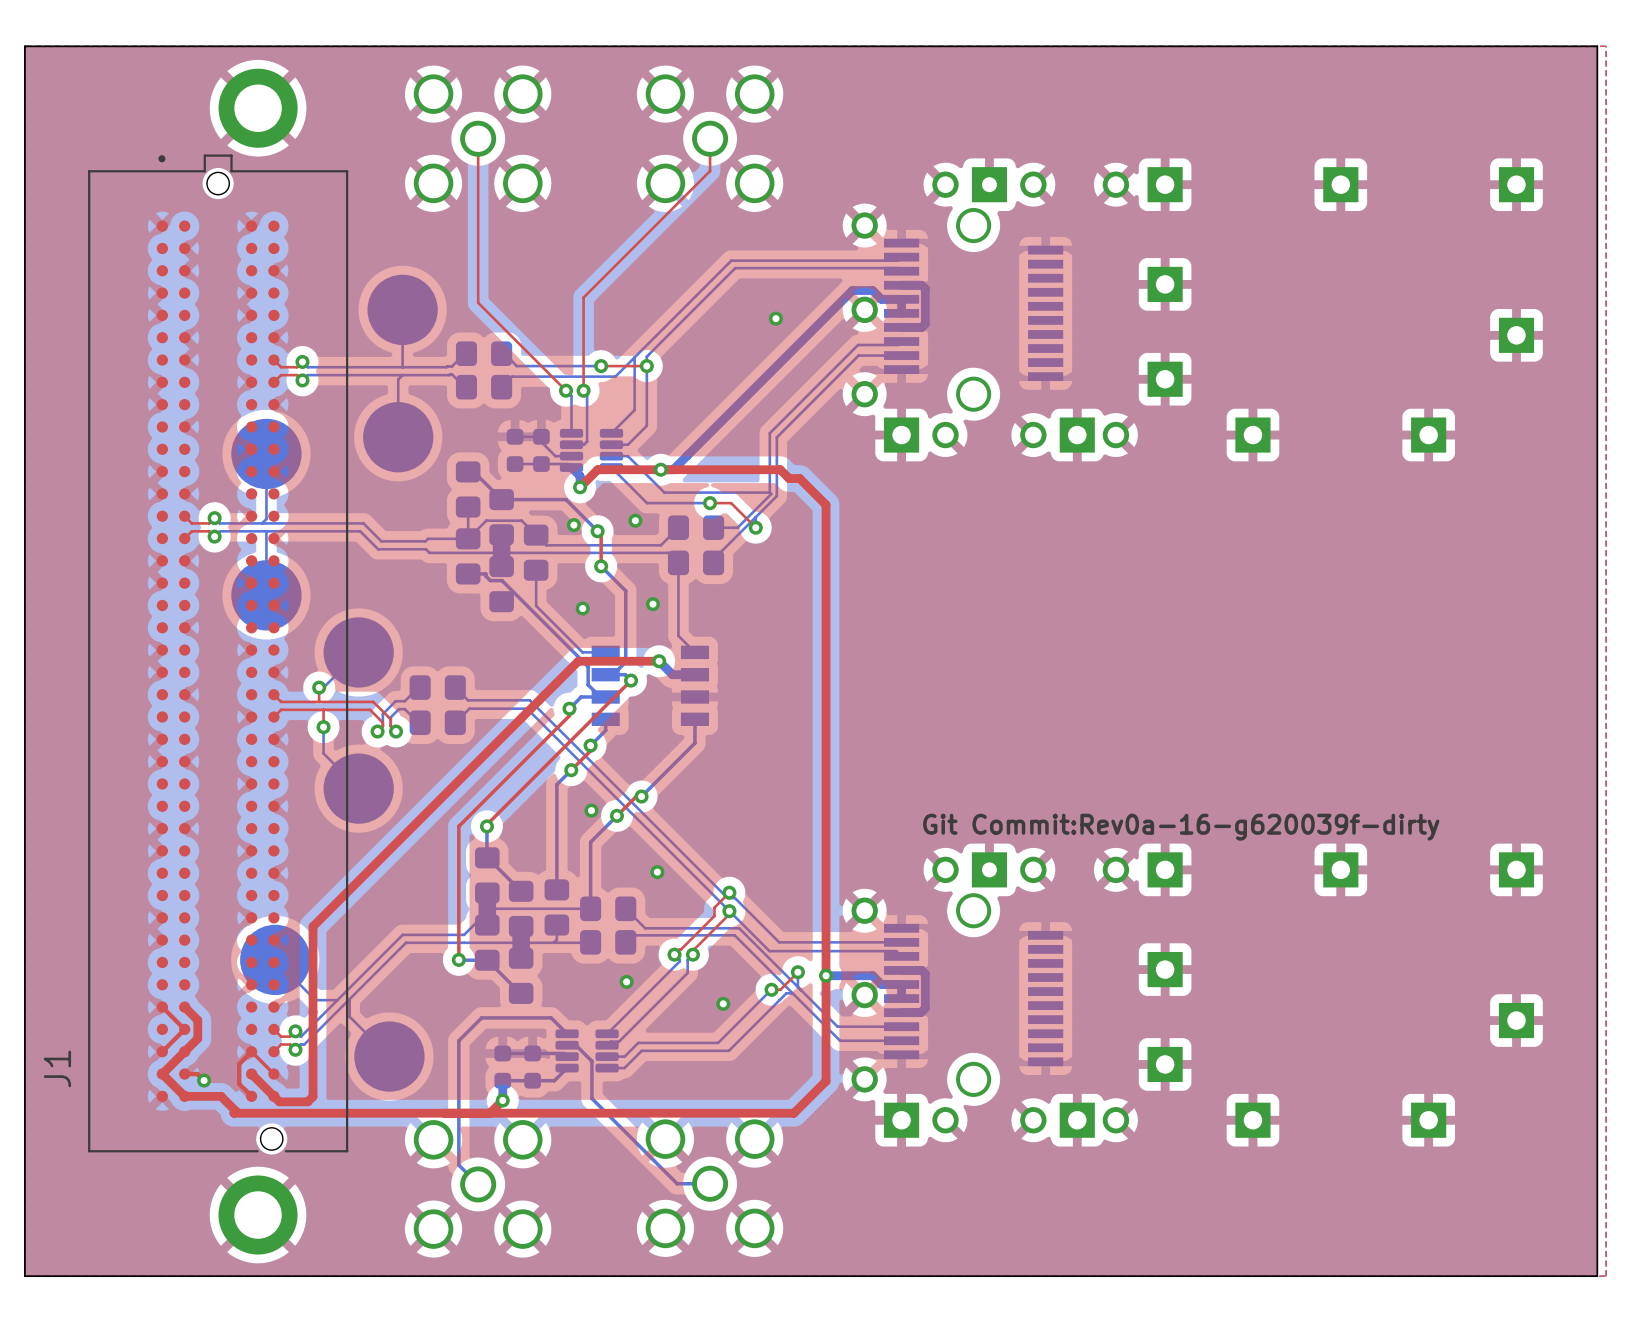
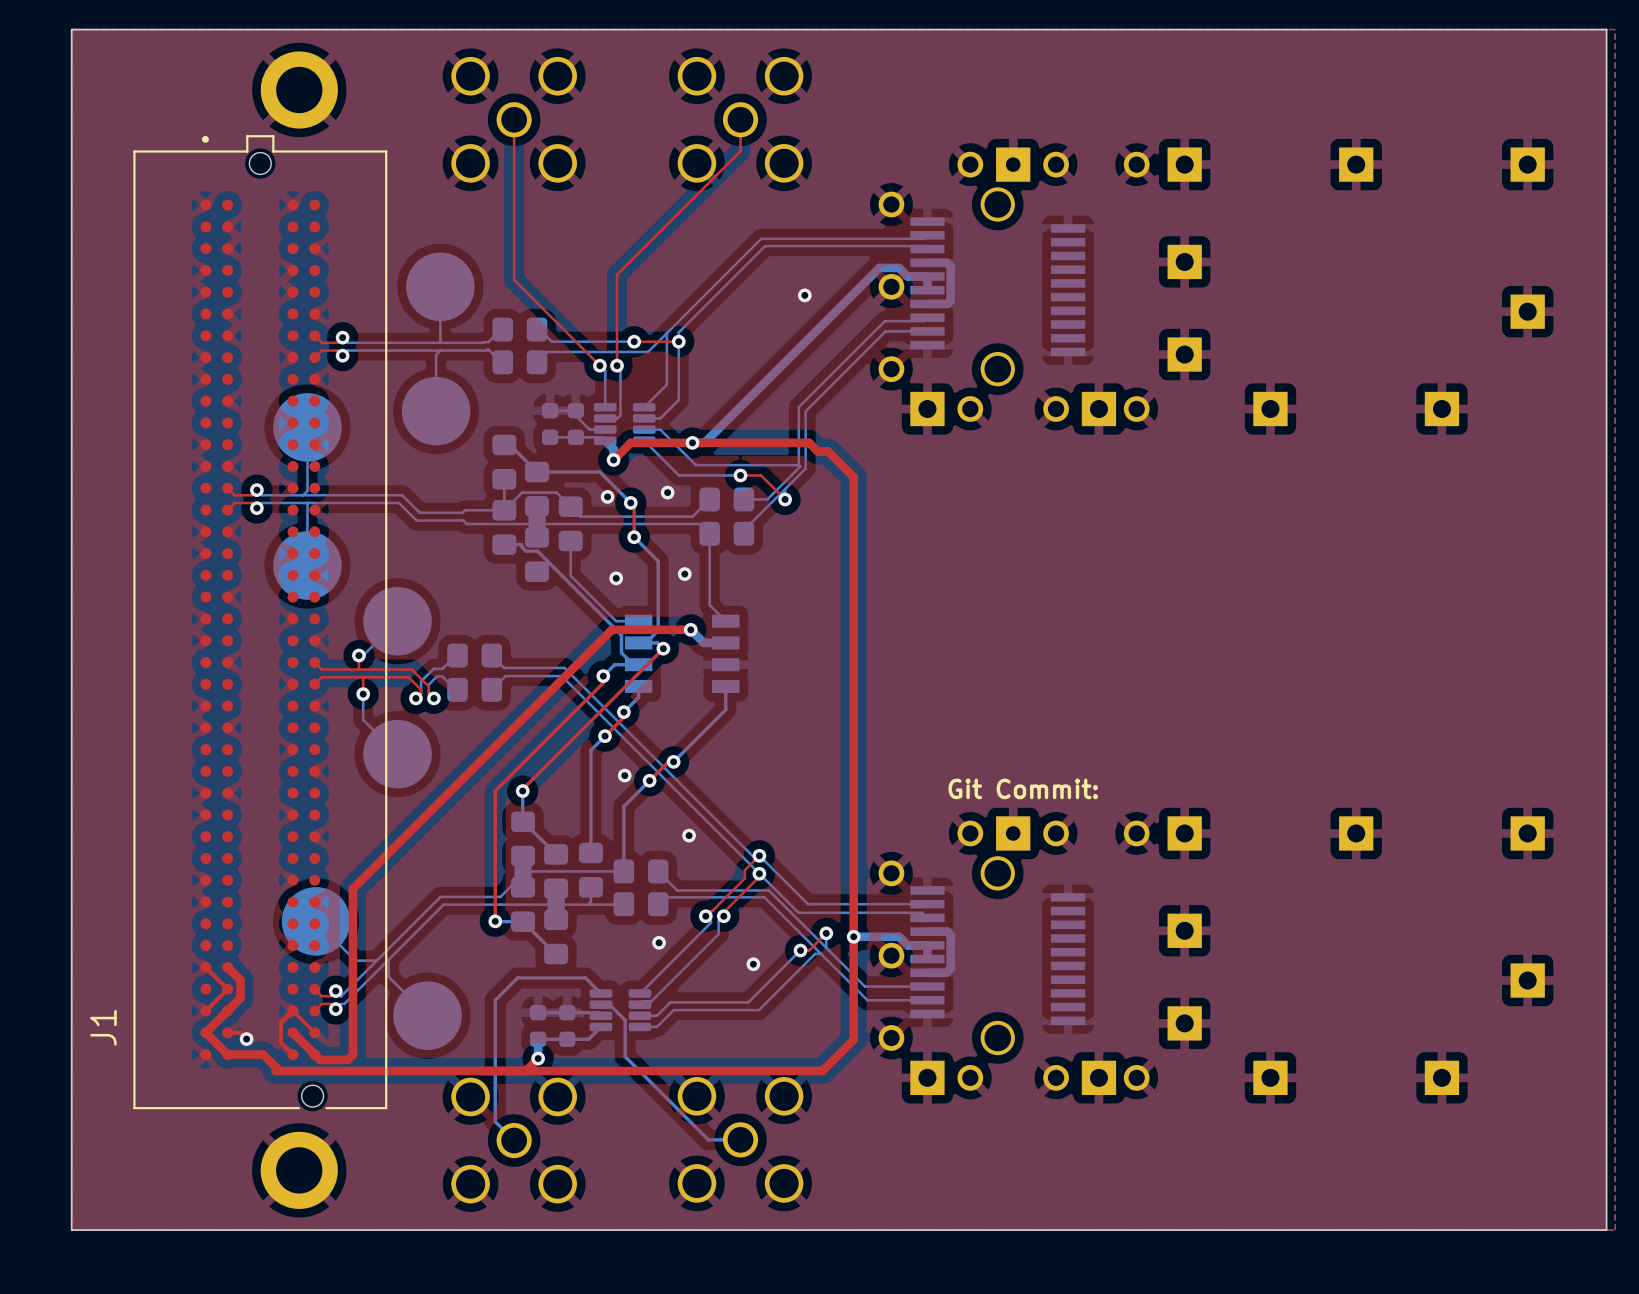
text: Git Commit:Rev0a-16-g620039f-dirty (1181, 827) -> Git Commit: (1023, 788)

